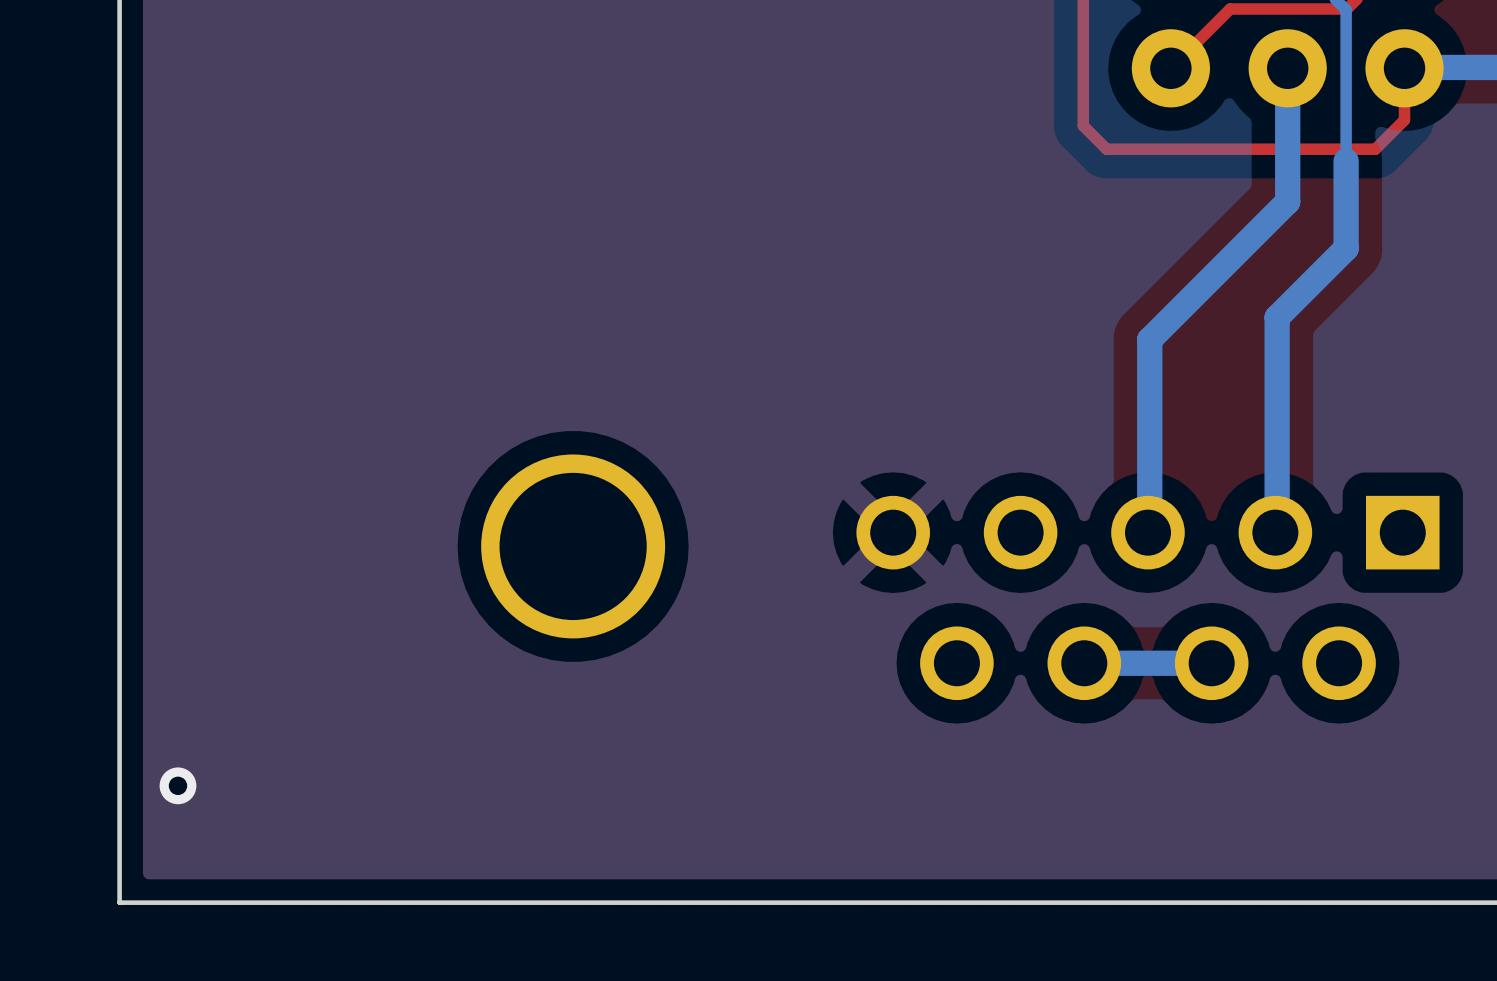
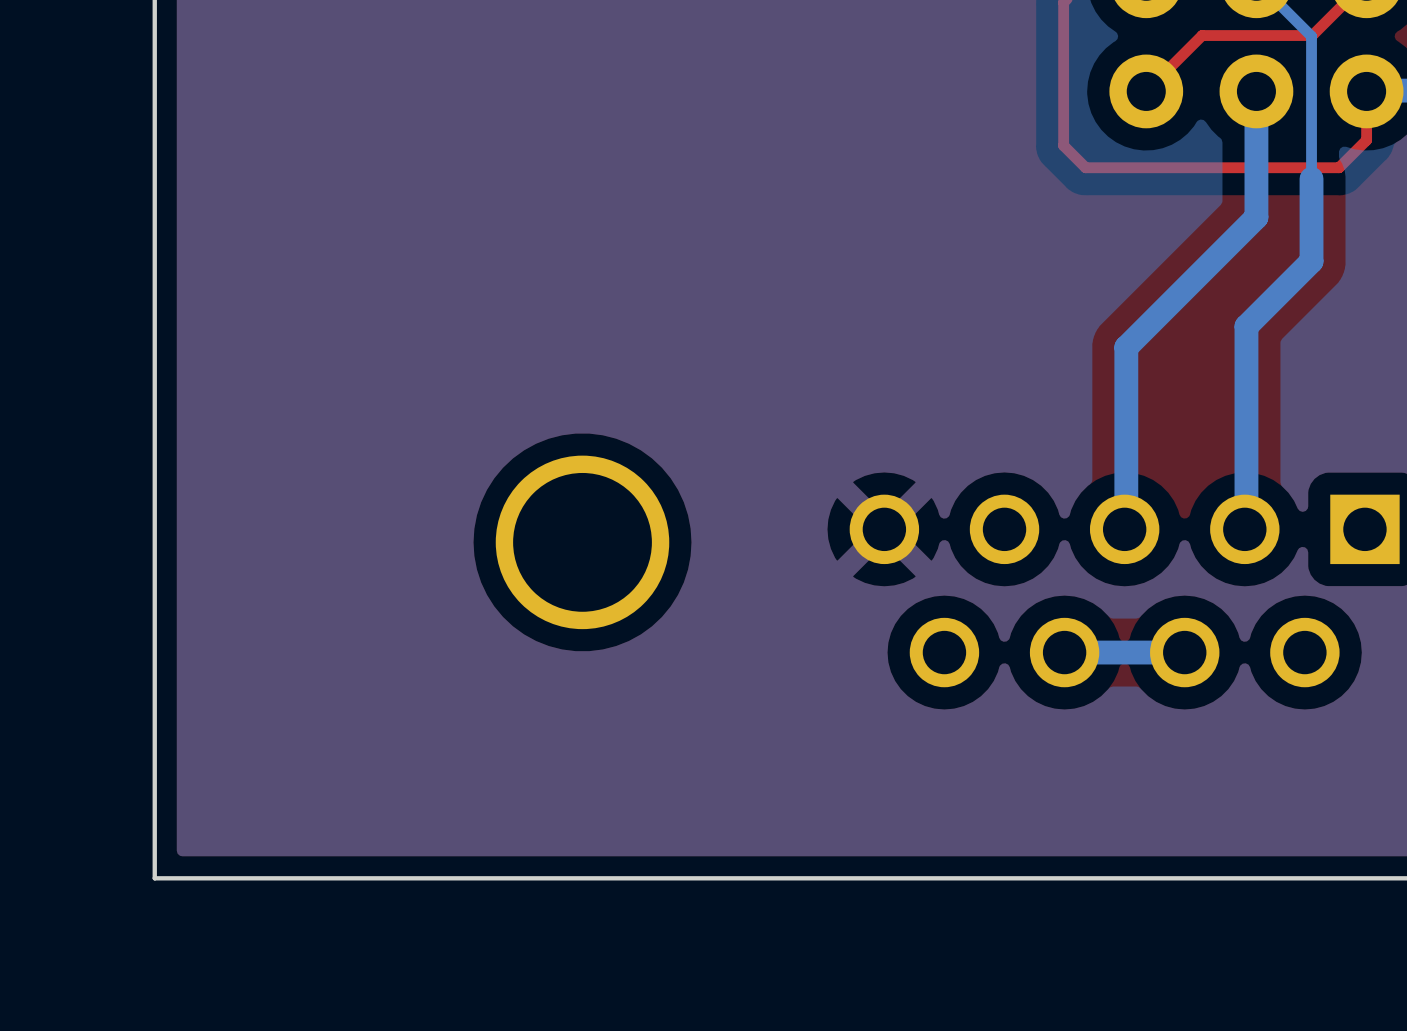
via: (177, 785) -> none

